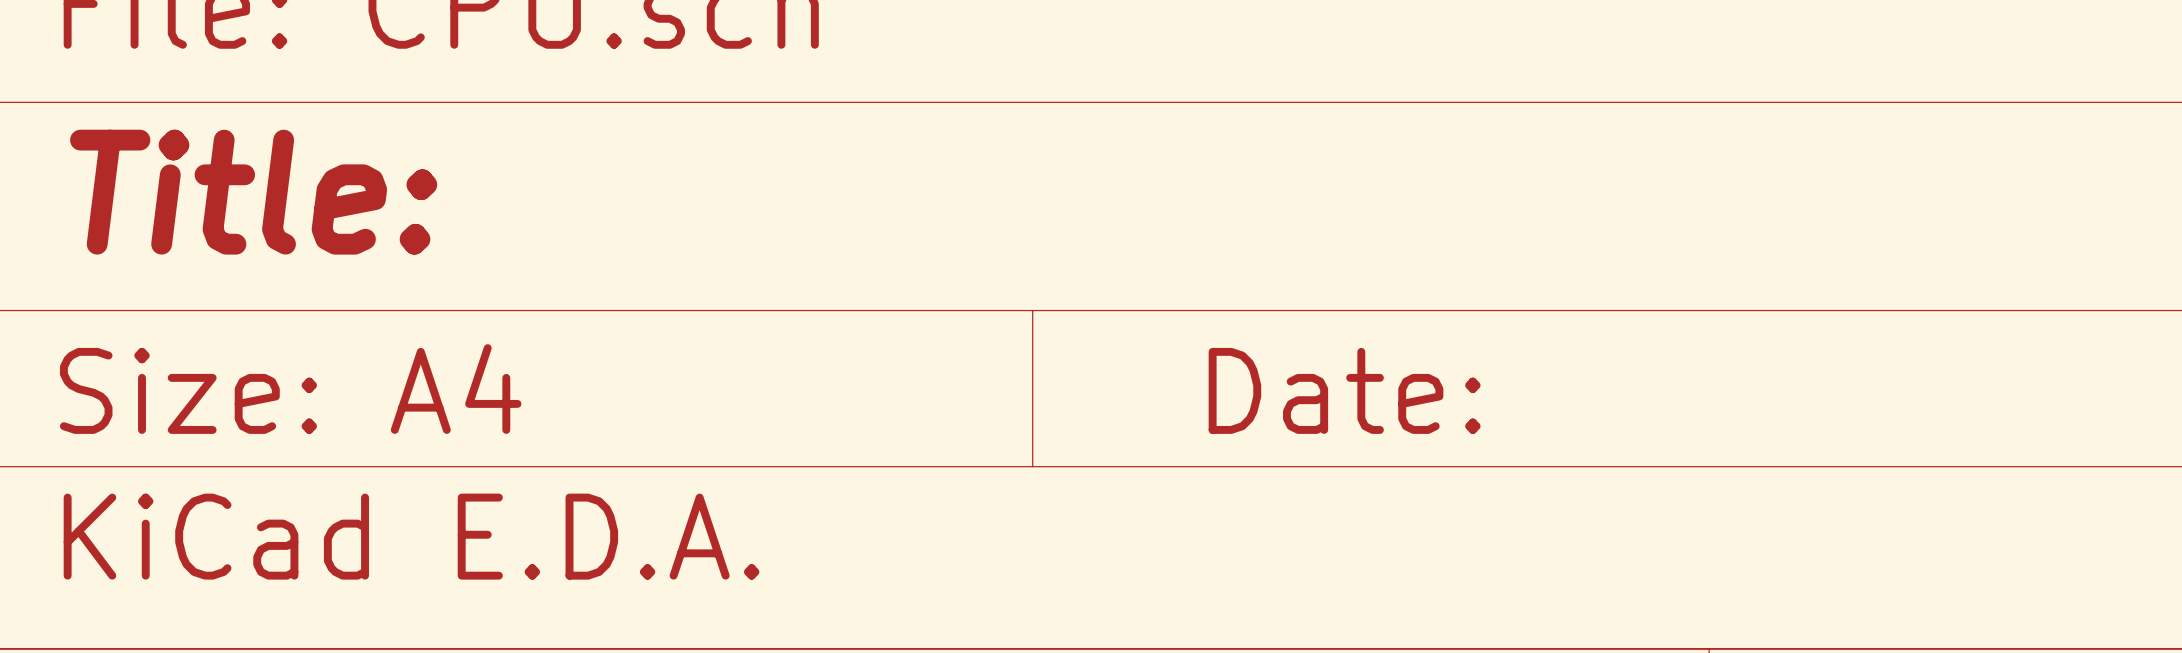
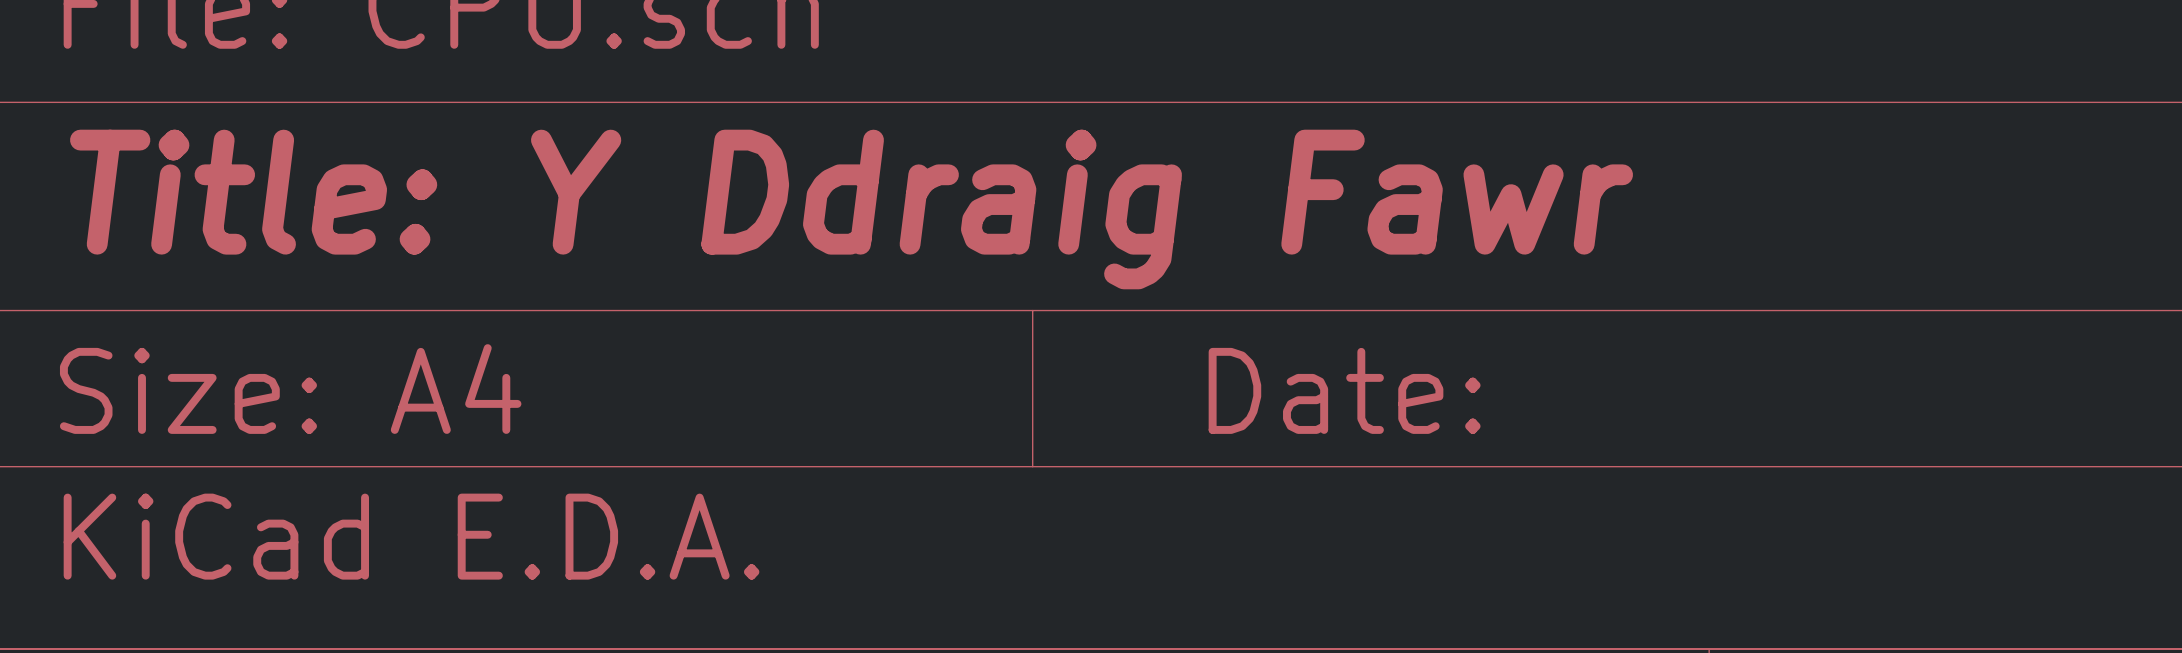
title block: Title: (253, 192) -> Title: Y Ddraig Fawr (851, 209)

